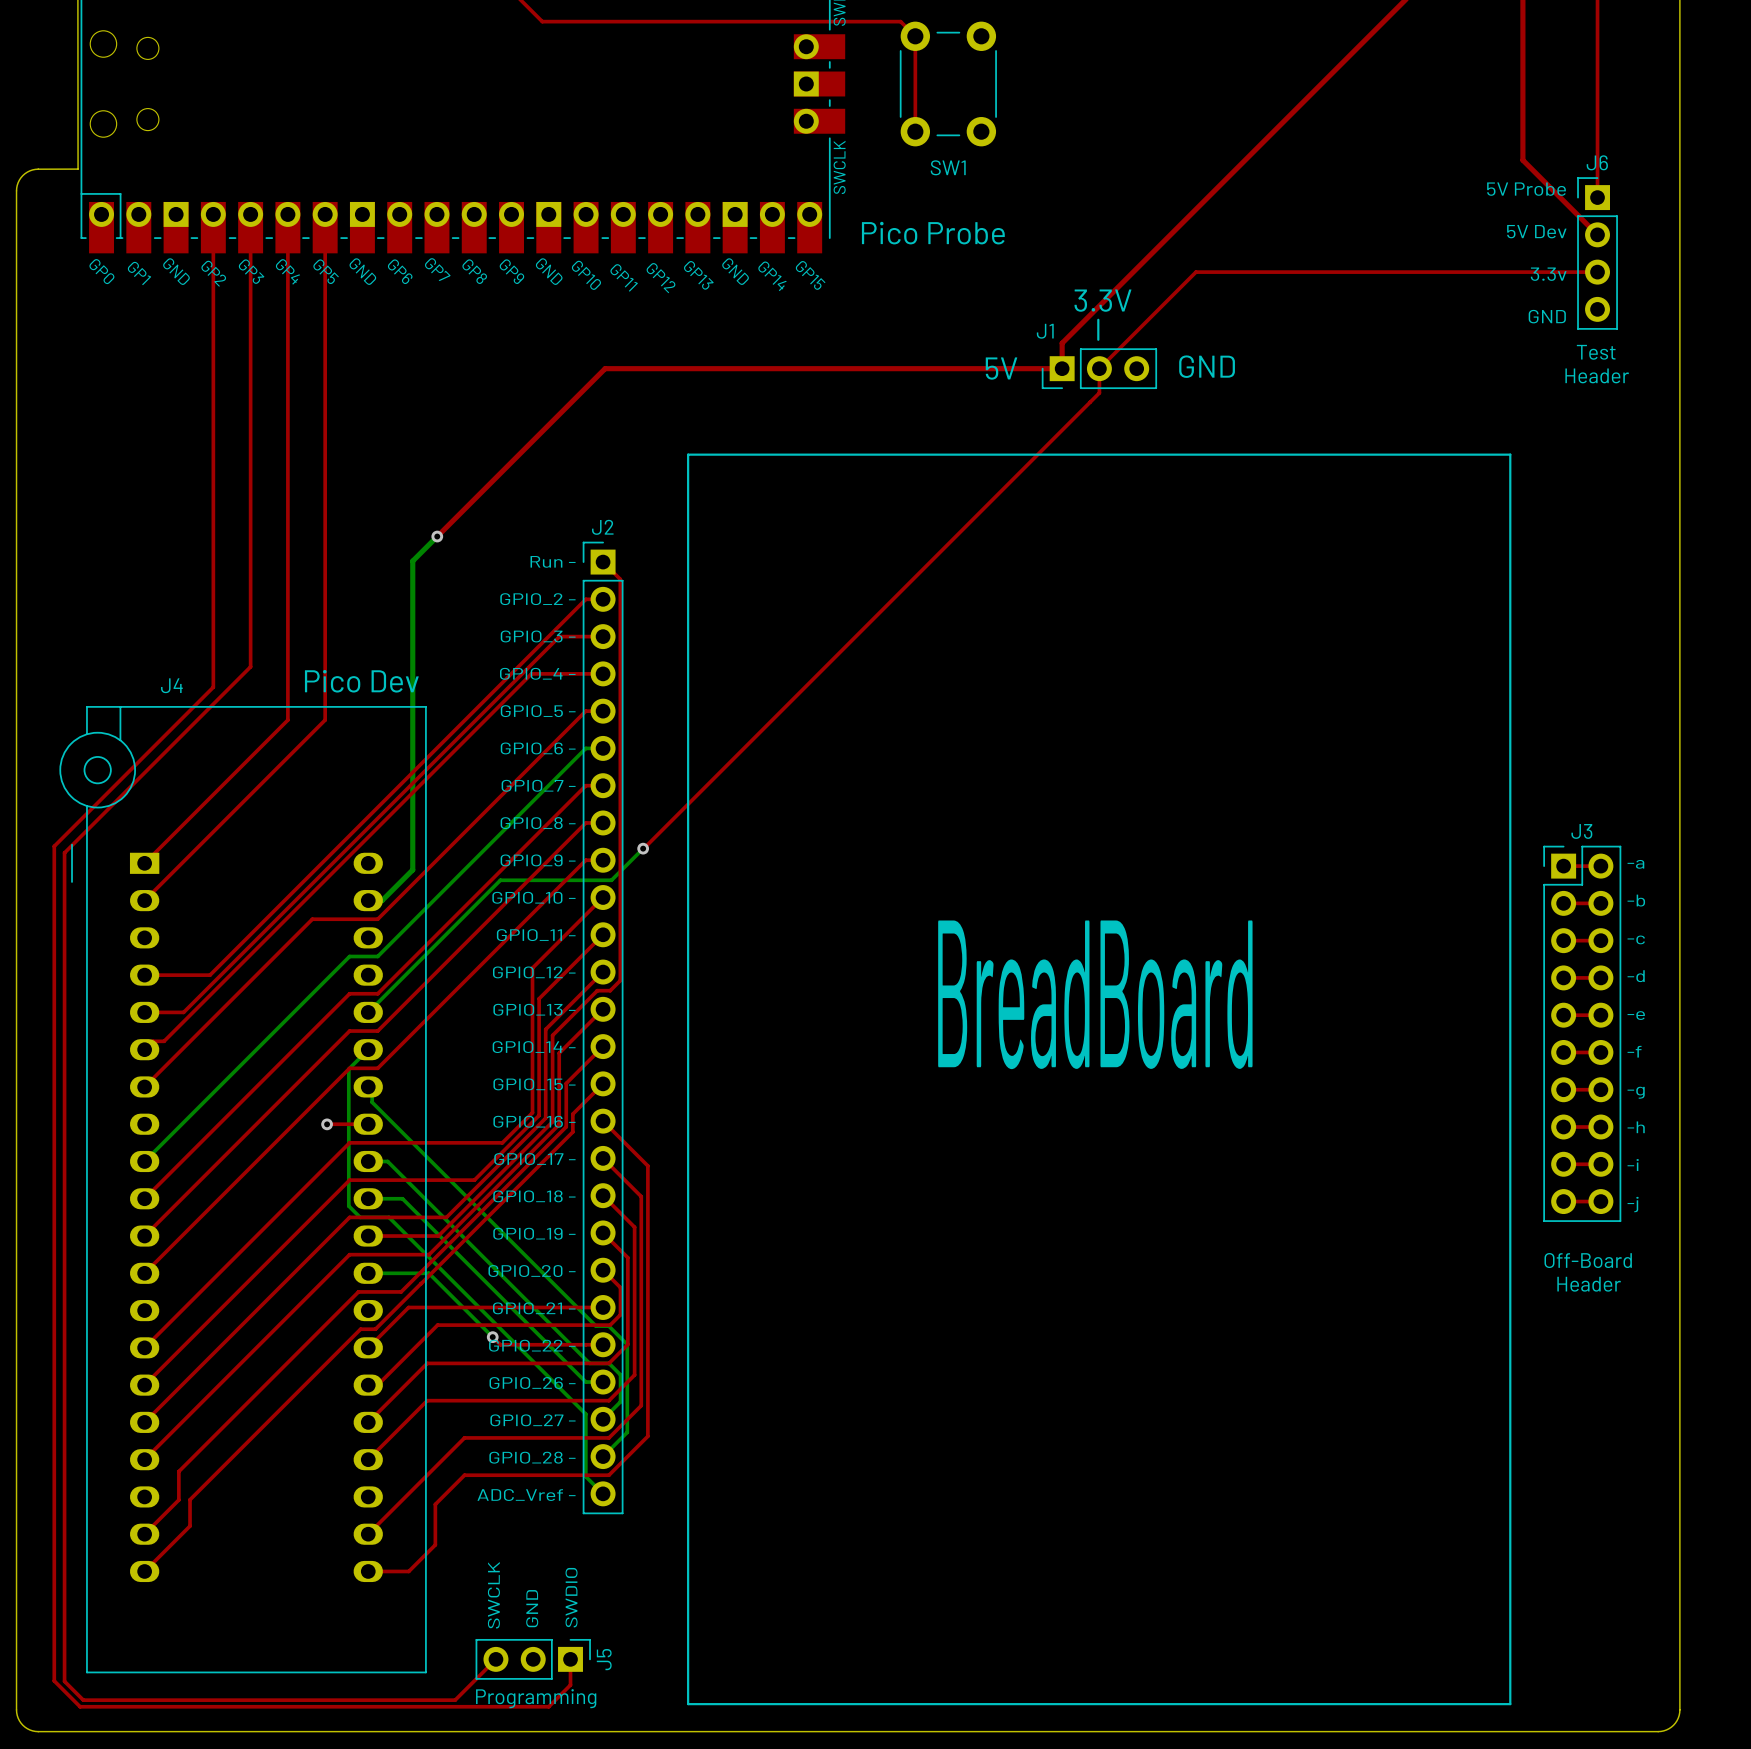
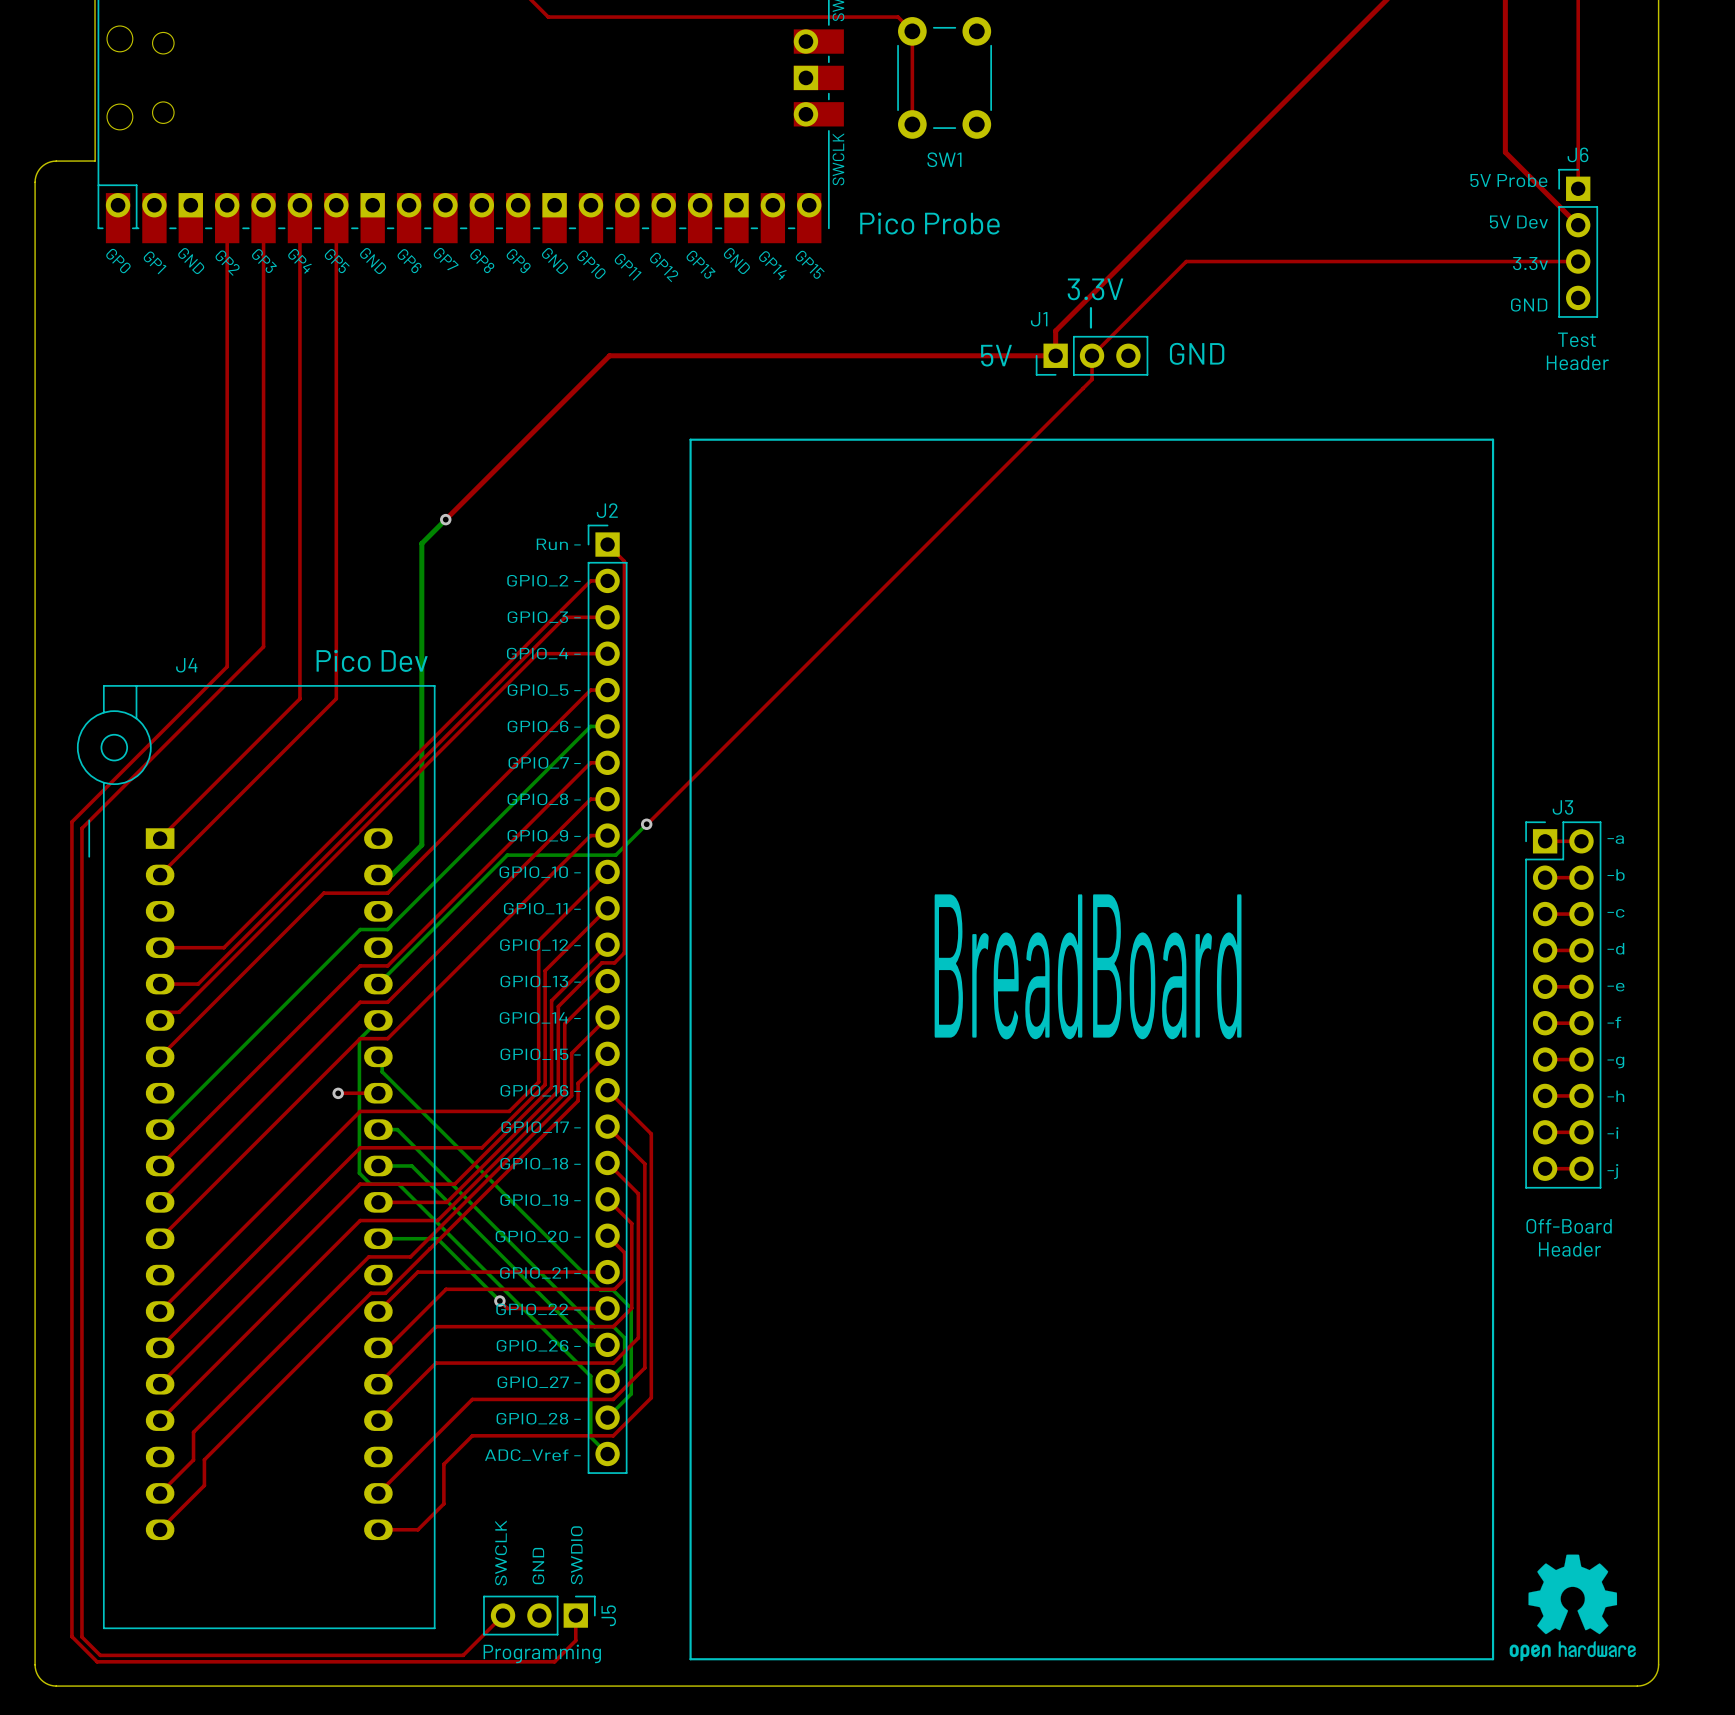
drawing: none -> [1509, 1554, 1636, 1662]

